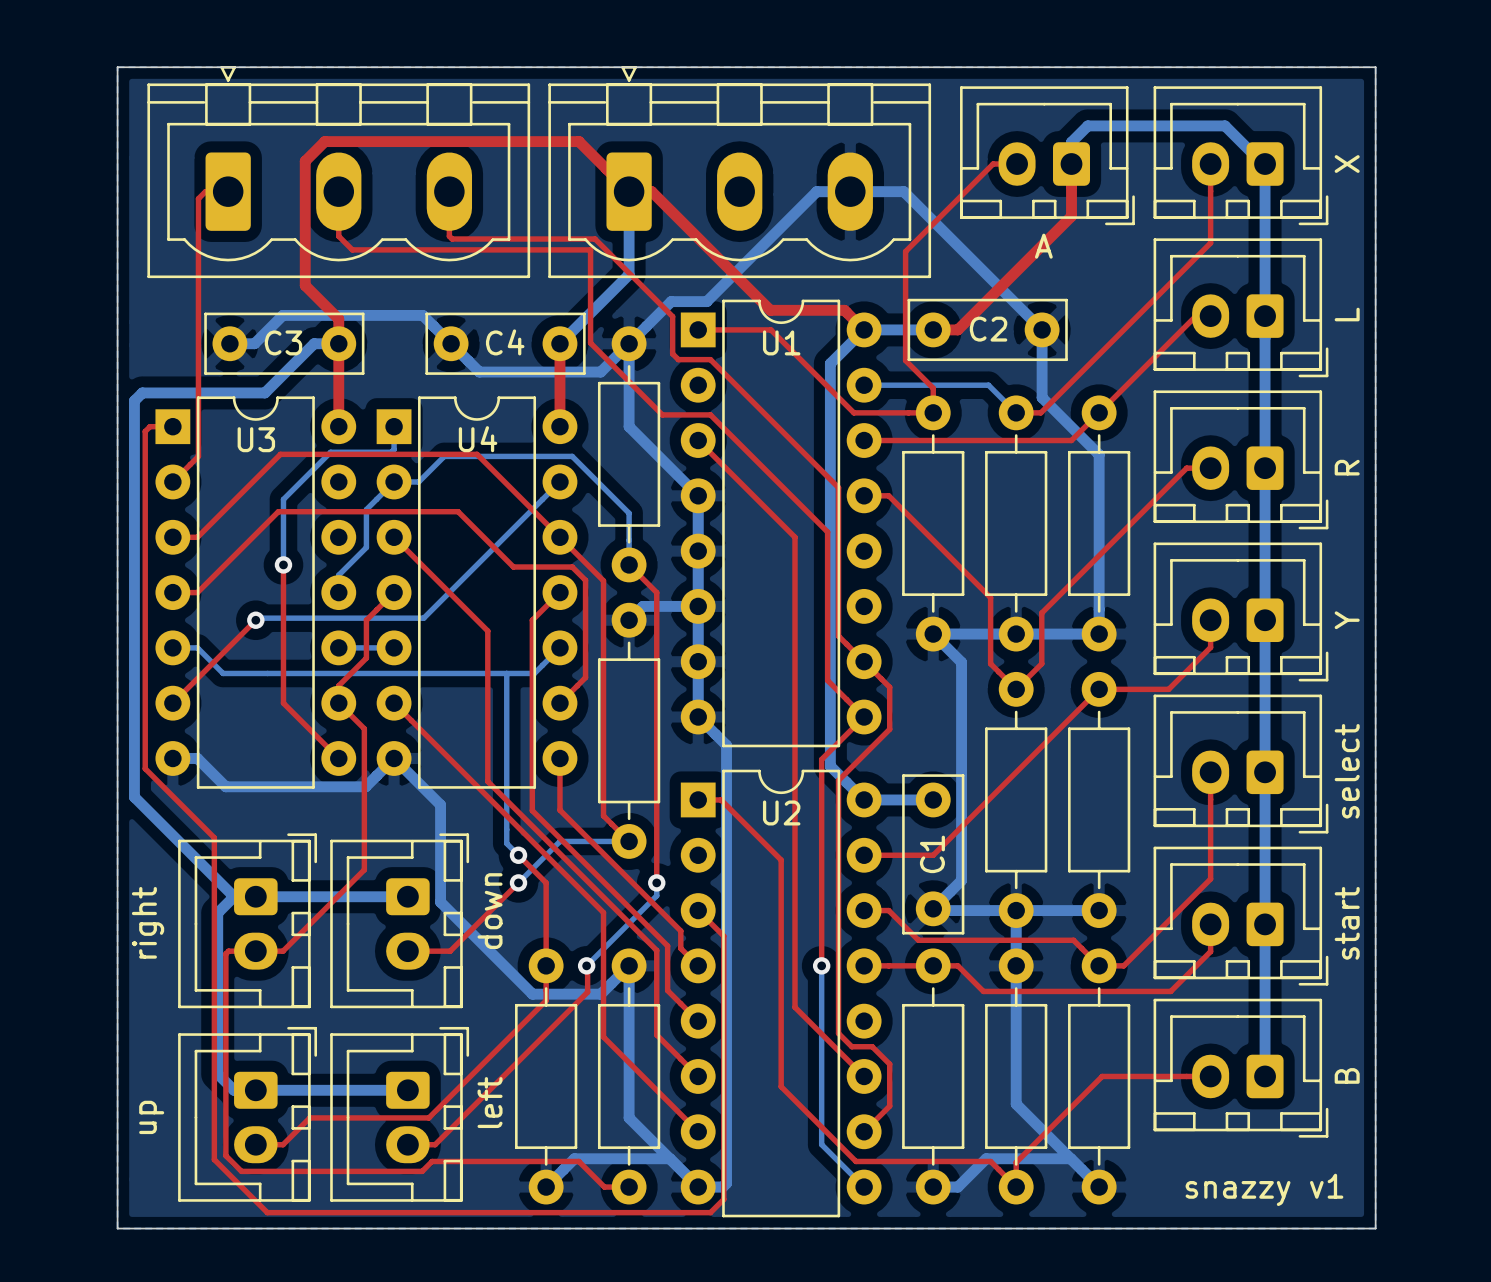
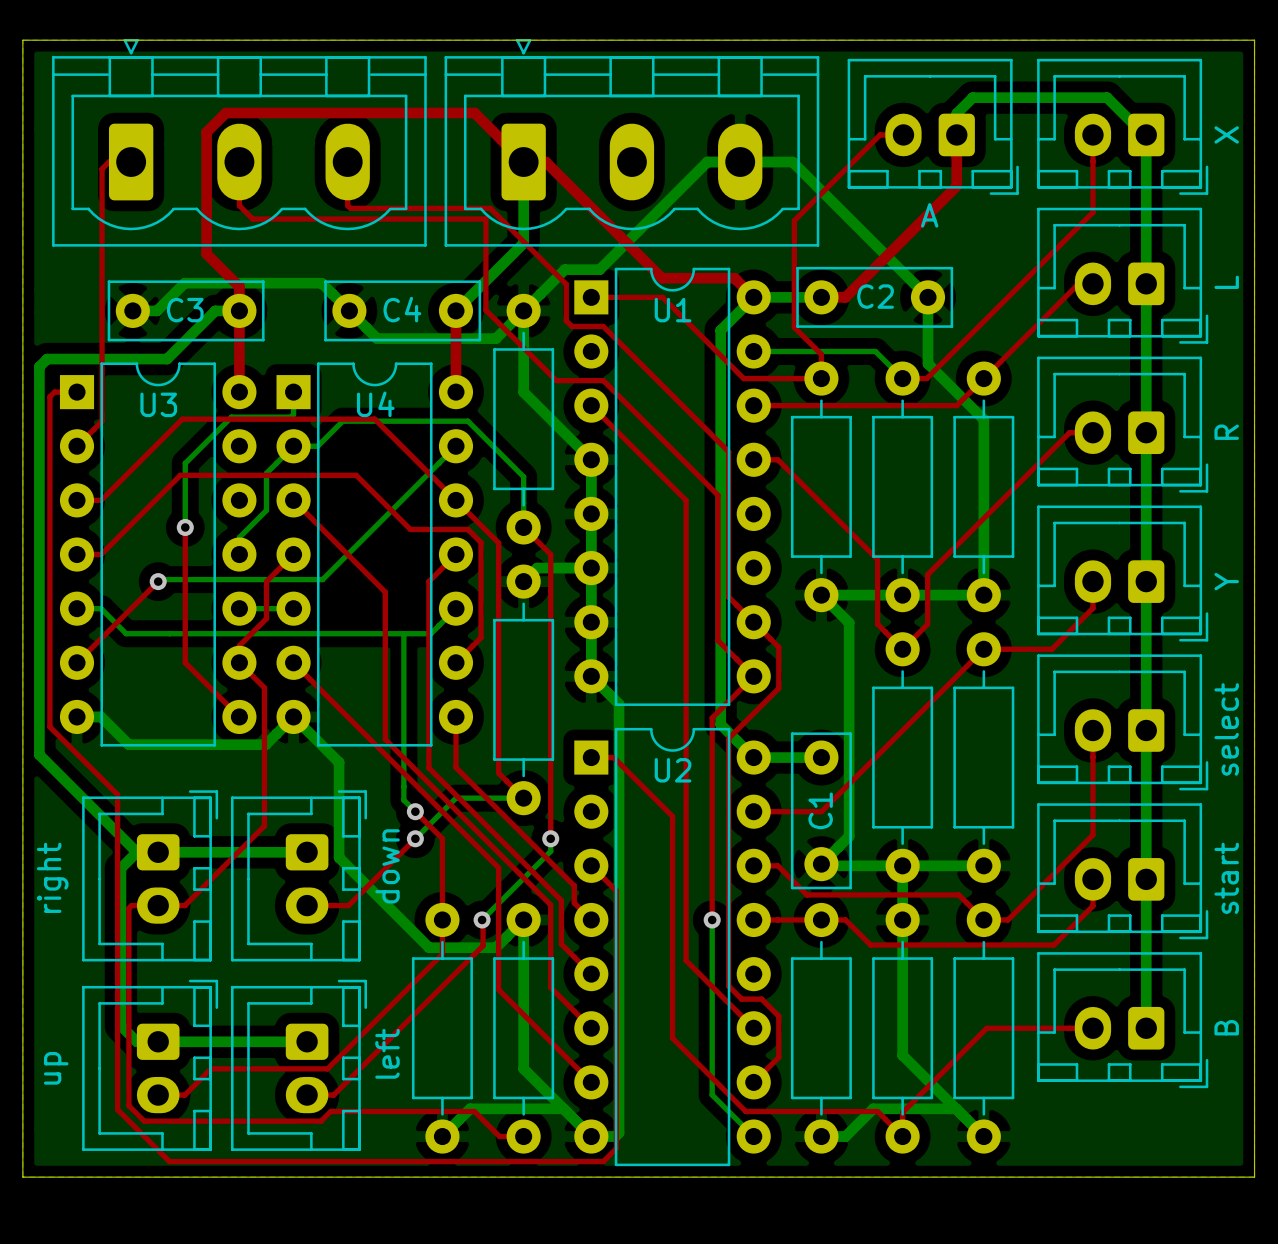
text: snazzy v1 (1264, 1189) -> none

